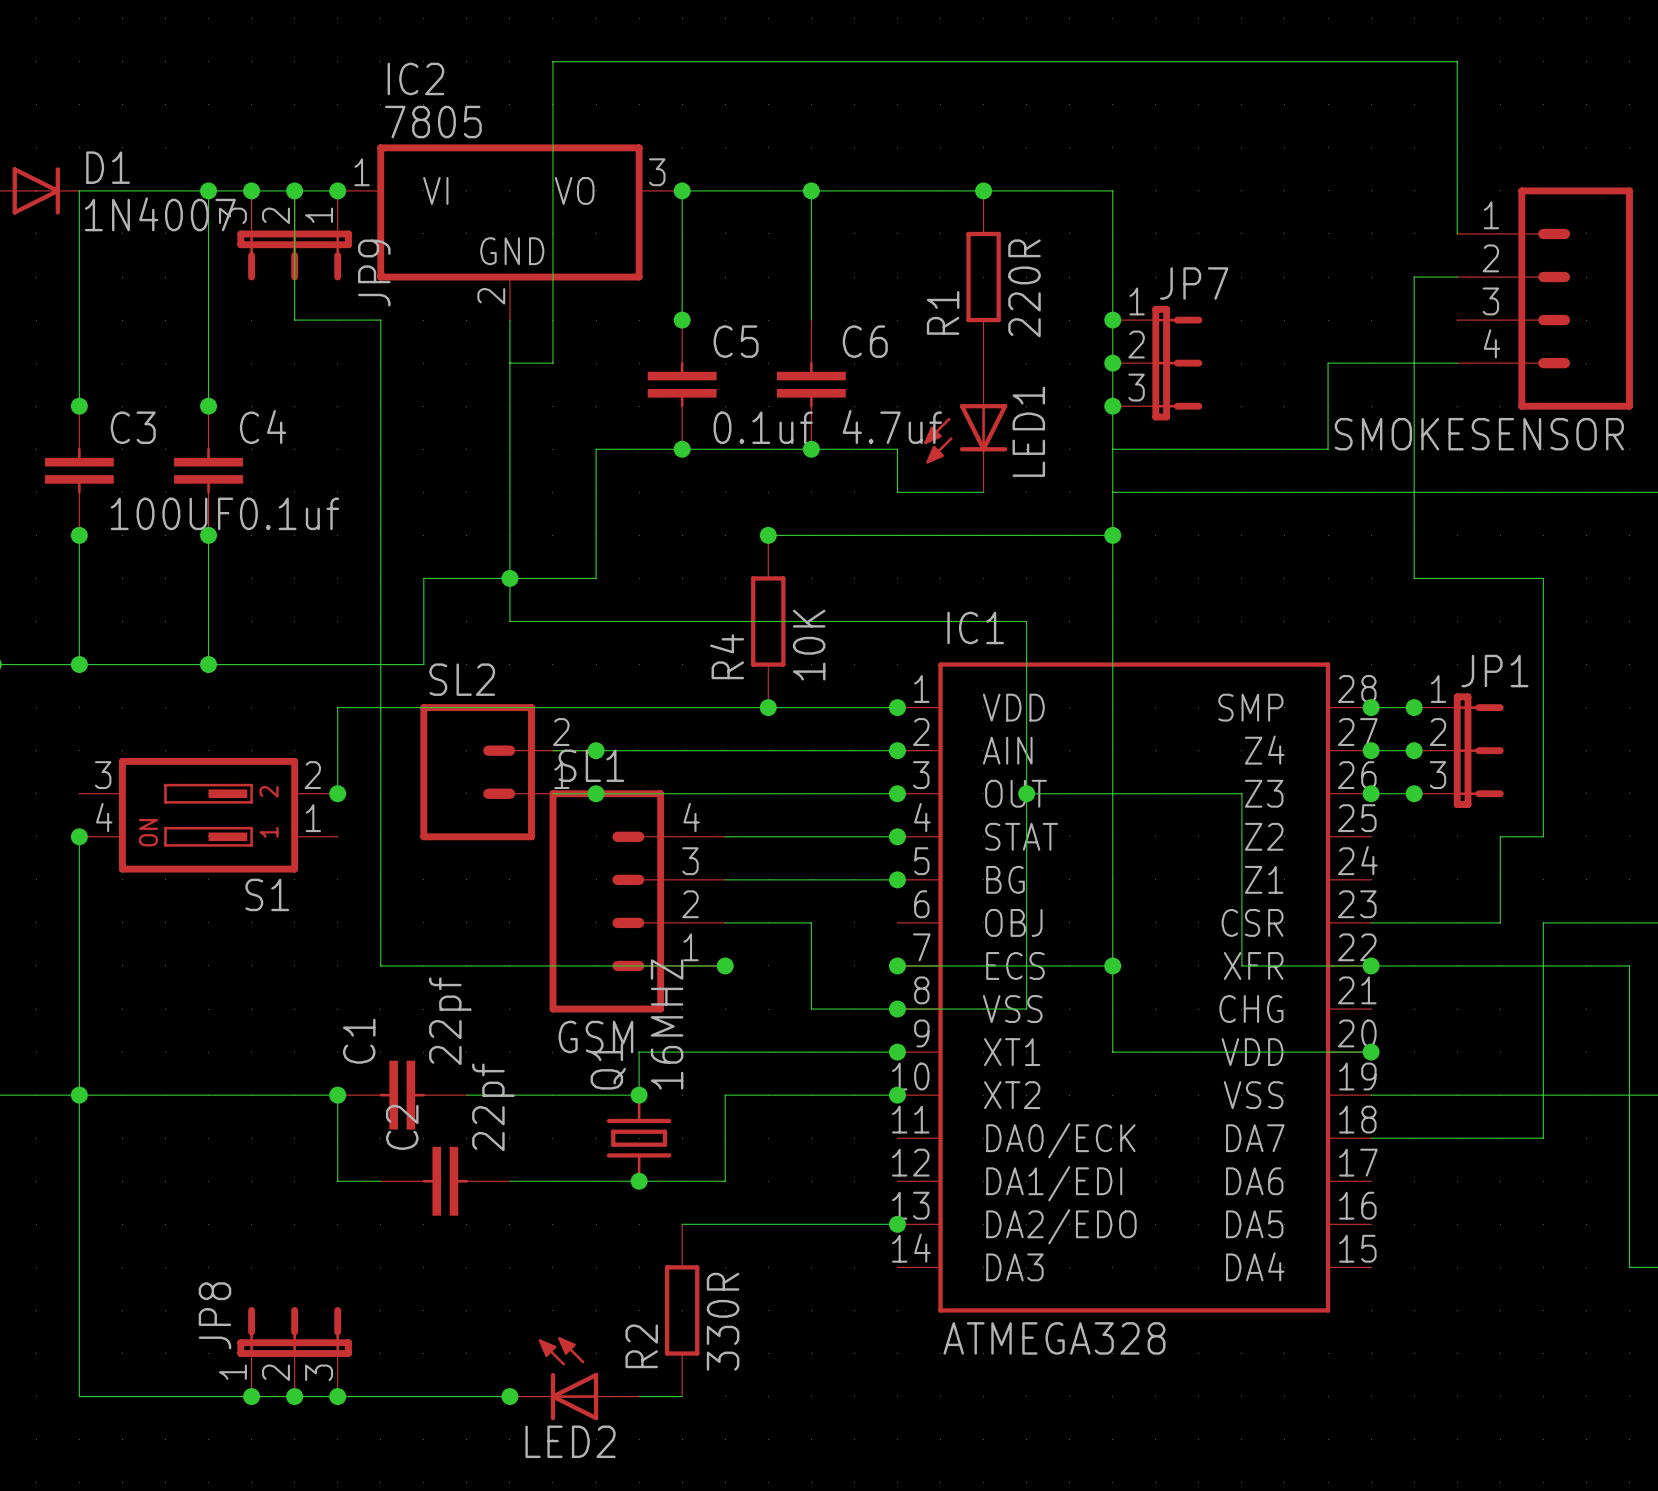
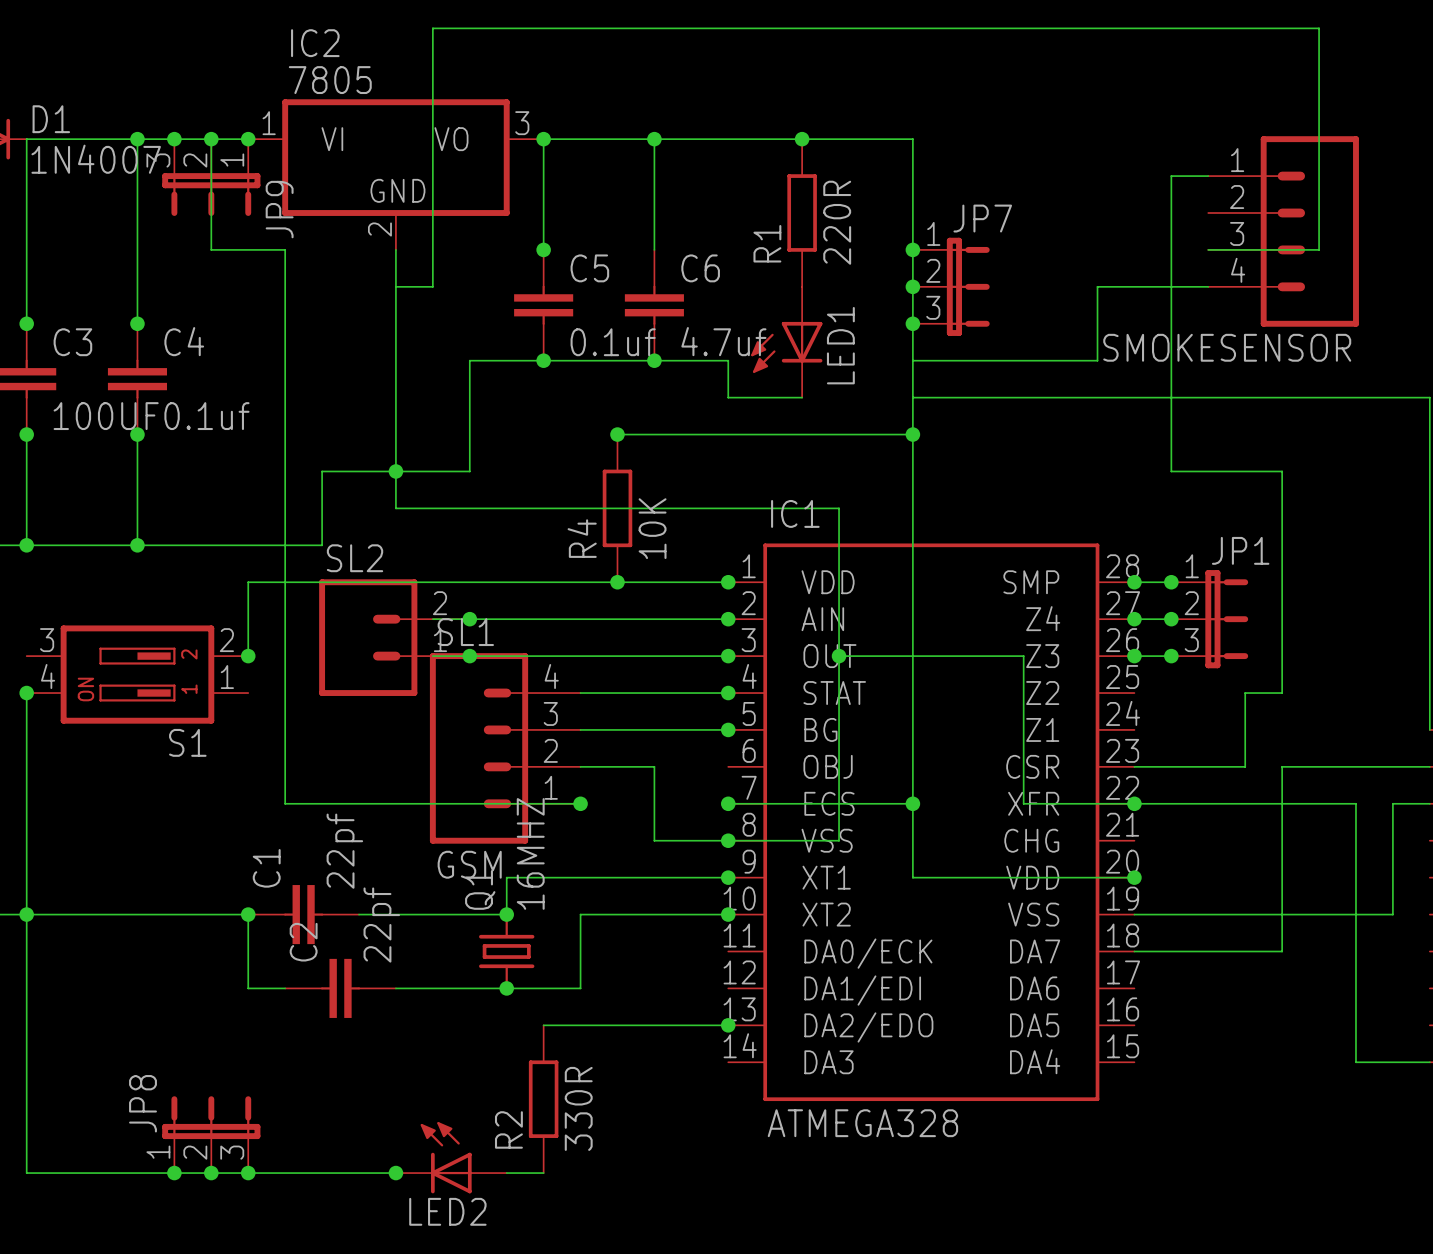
wire: (1457, 61) (1457, 233) -> (1208, 28) (1319, 28) (1319, 249) (1208, 249)
wire: (1414, 277) (1457, 277) -> (1171, 213) (1171, 176) (1208, 176)

